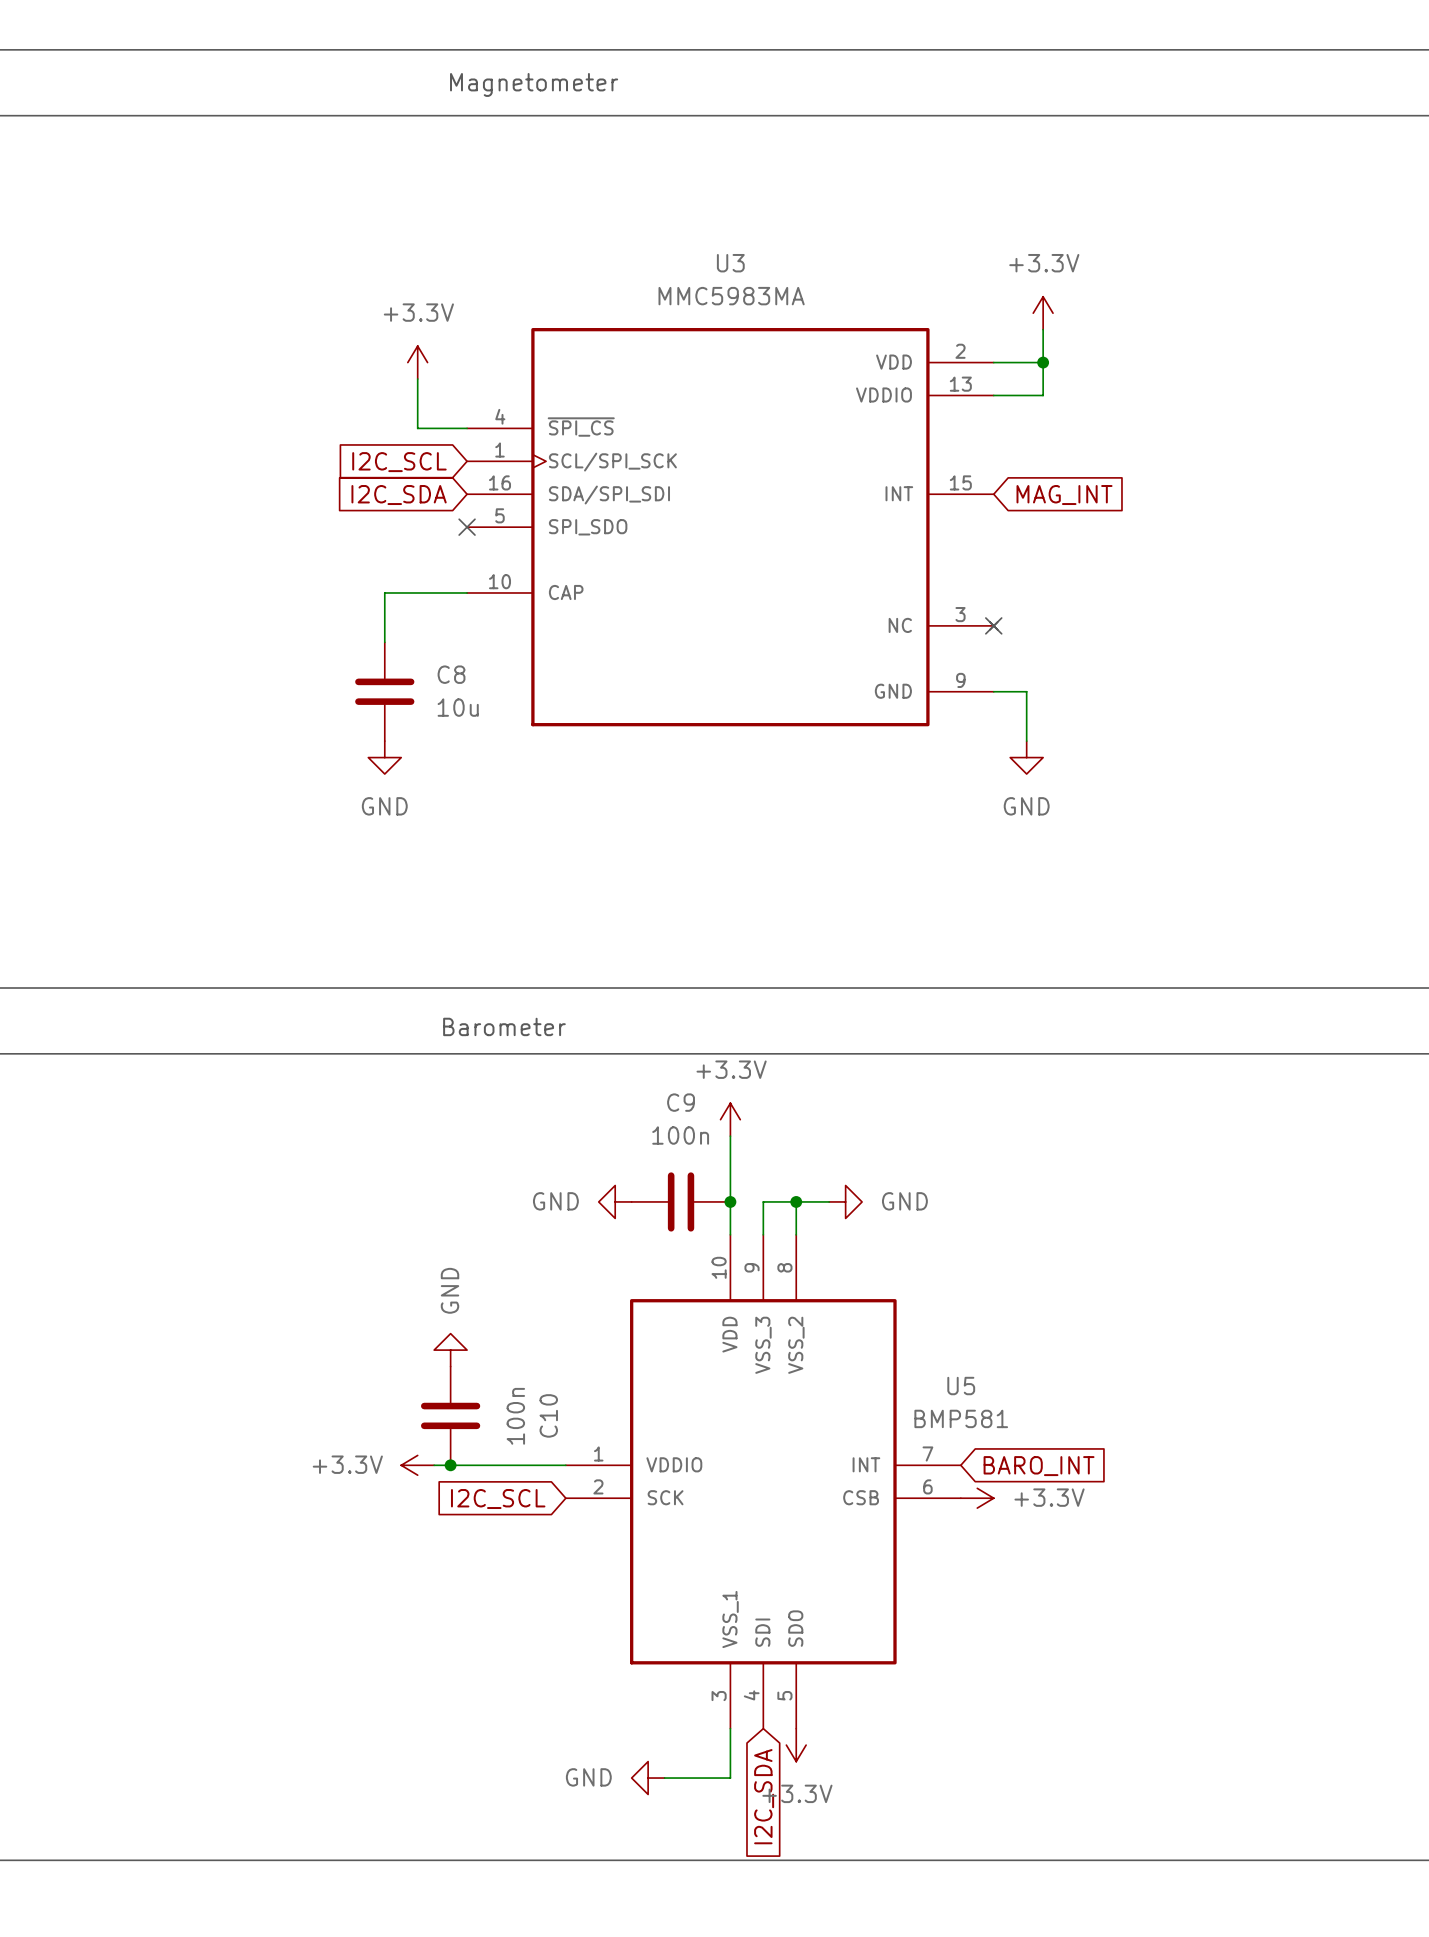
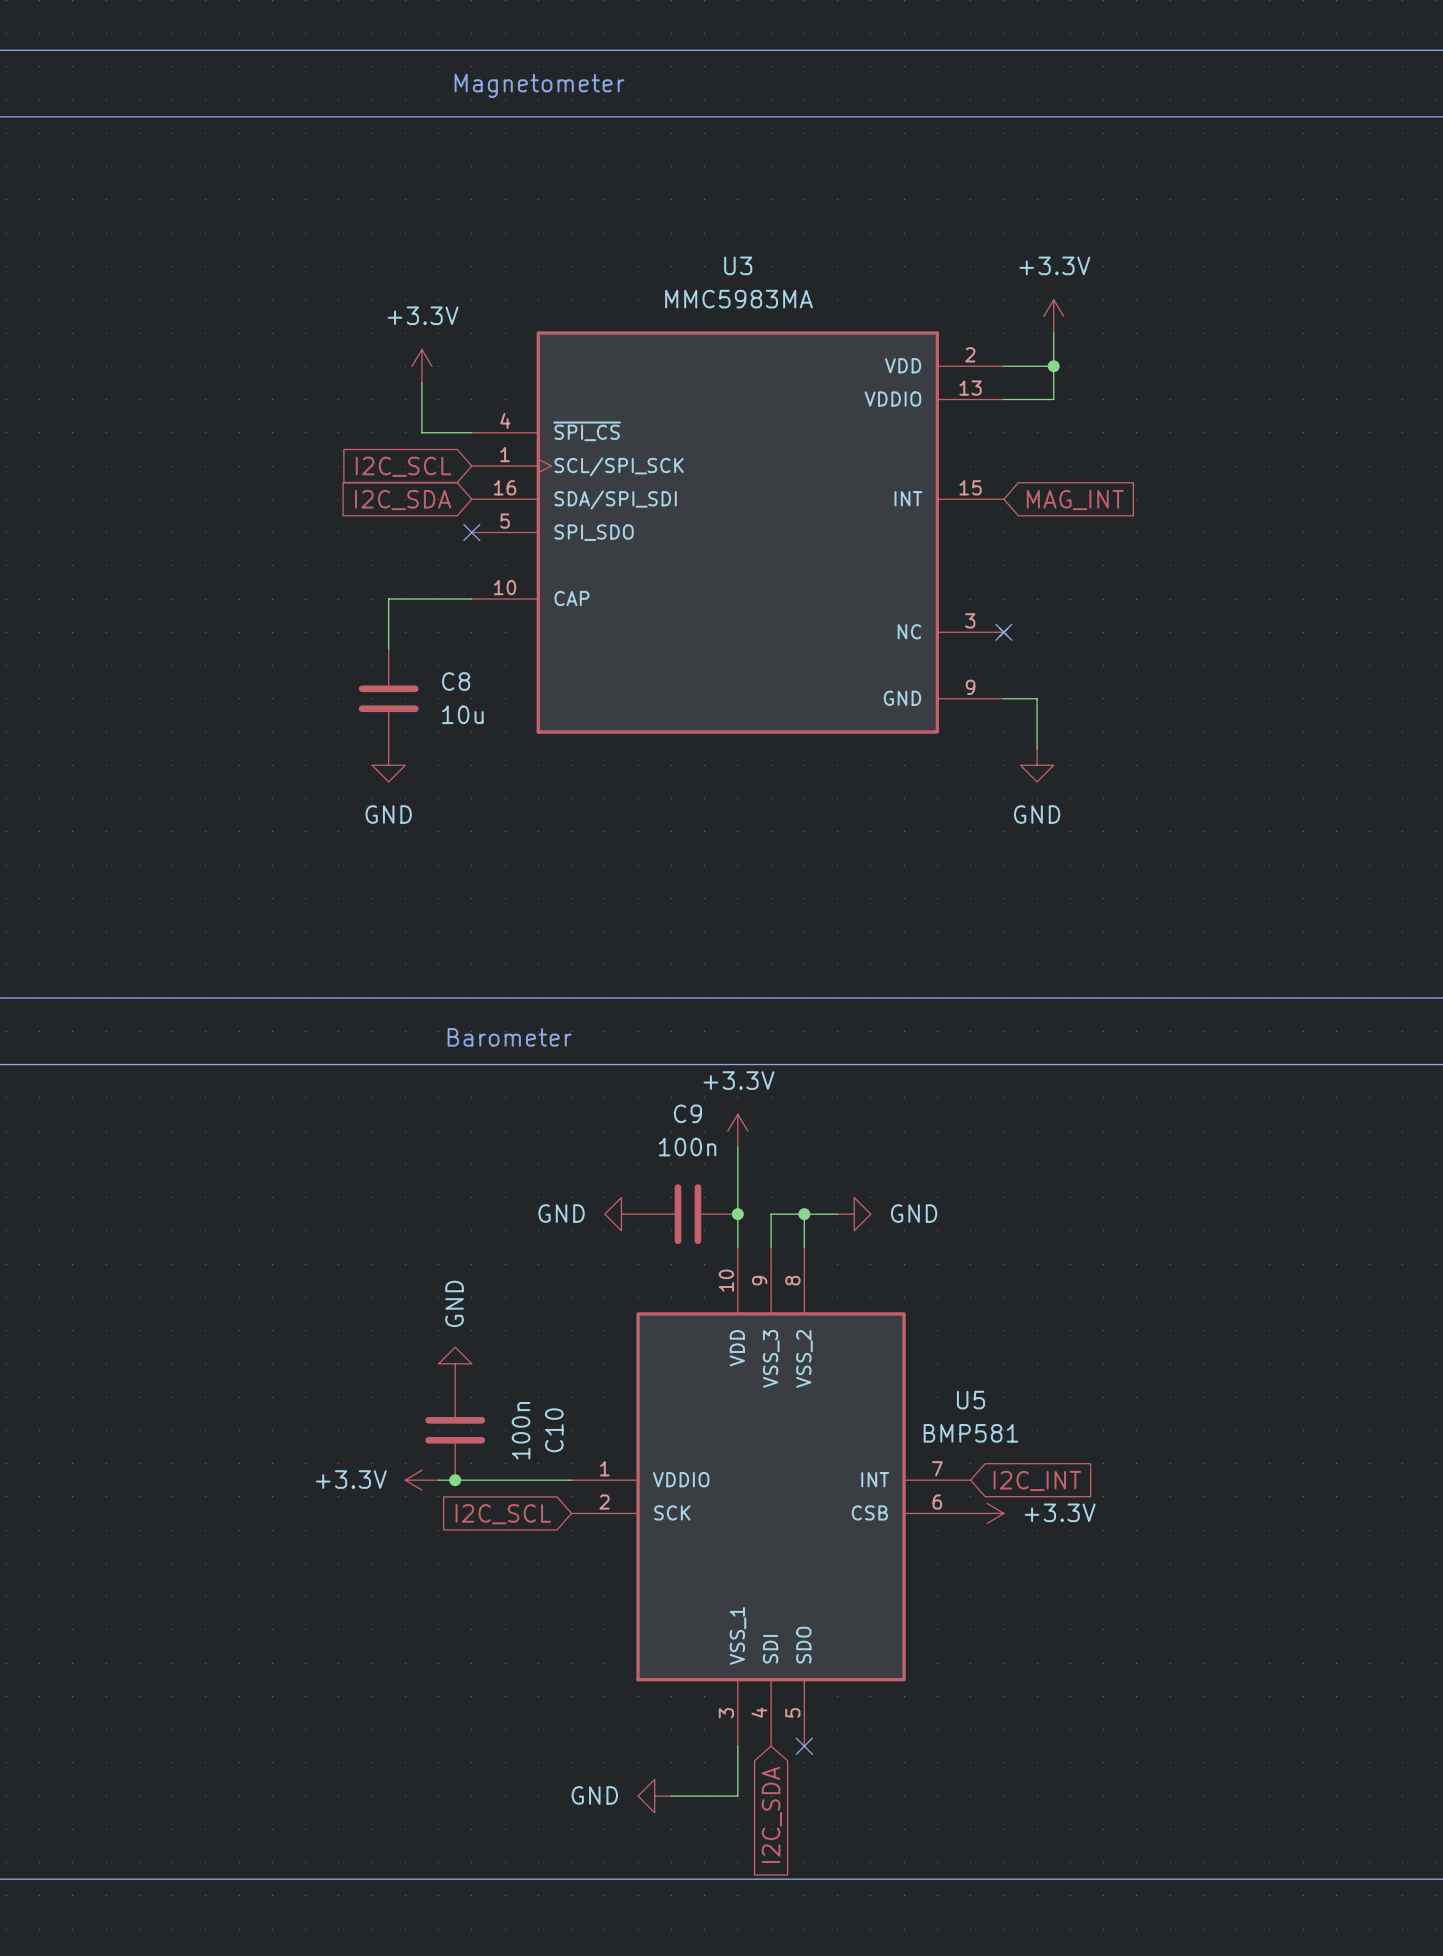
global label: BARO_INT (1039, 1466) -> I2C_INT (1037, 1480)
no-connect mark: none -> (804, 1746)
power symbol: +3.3V (796, 1745) -> none

